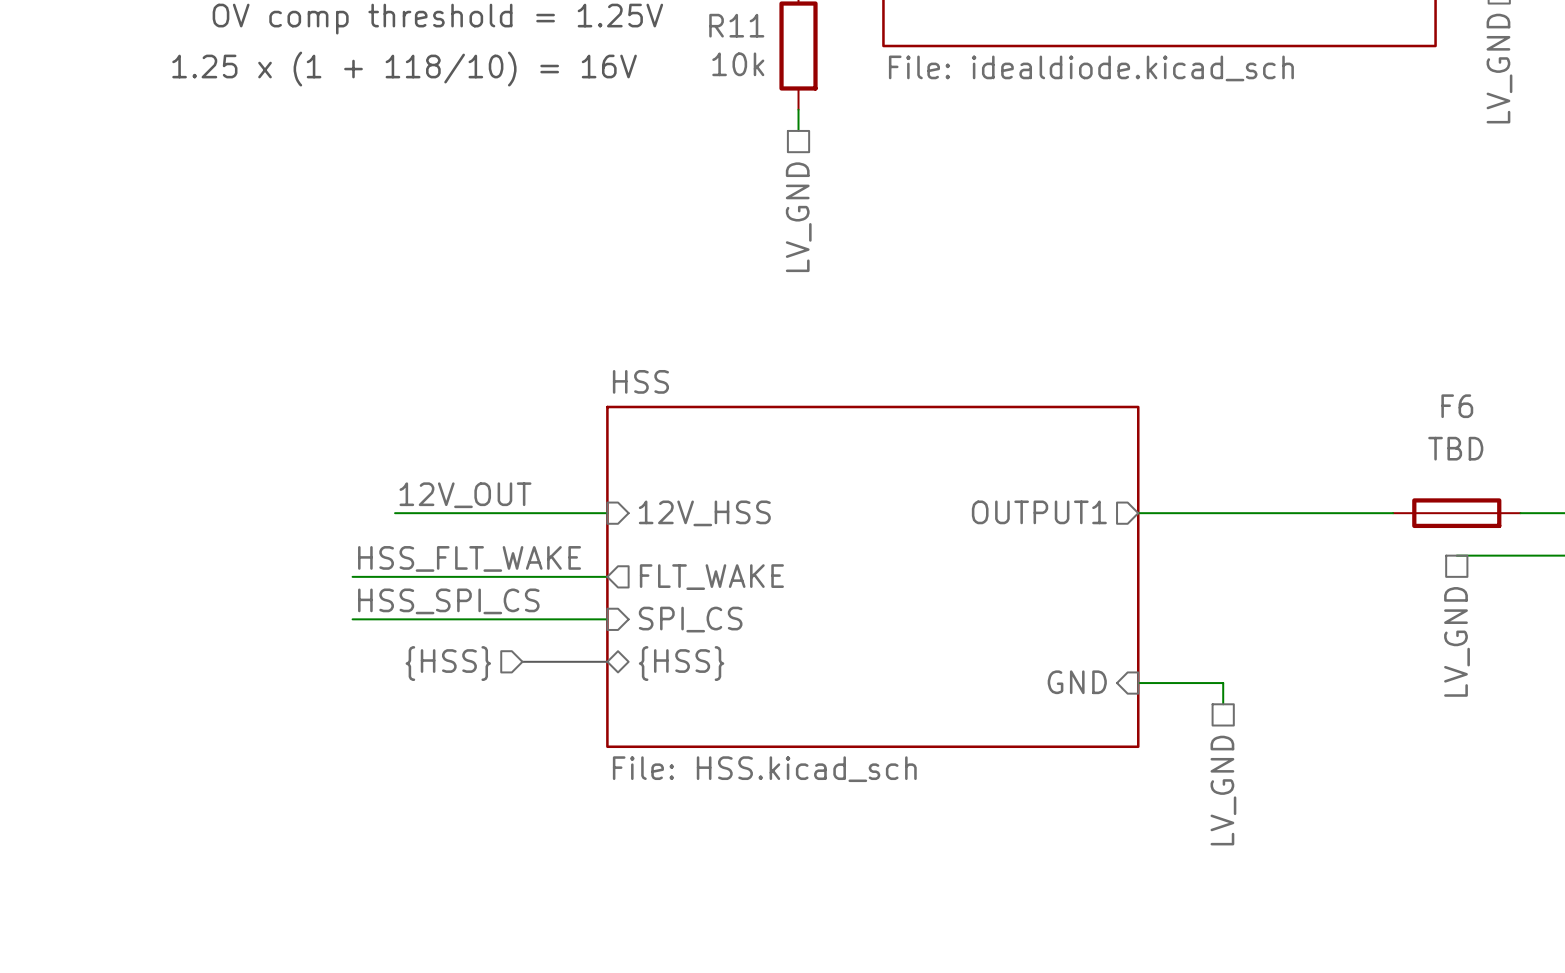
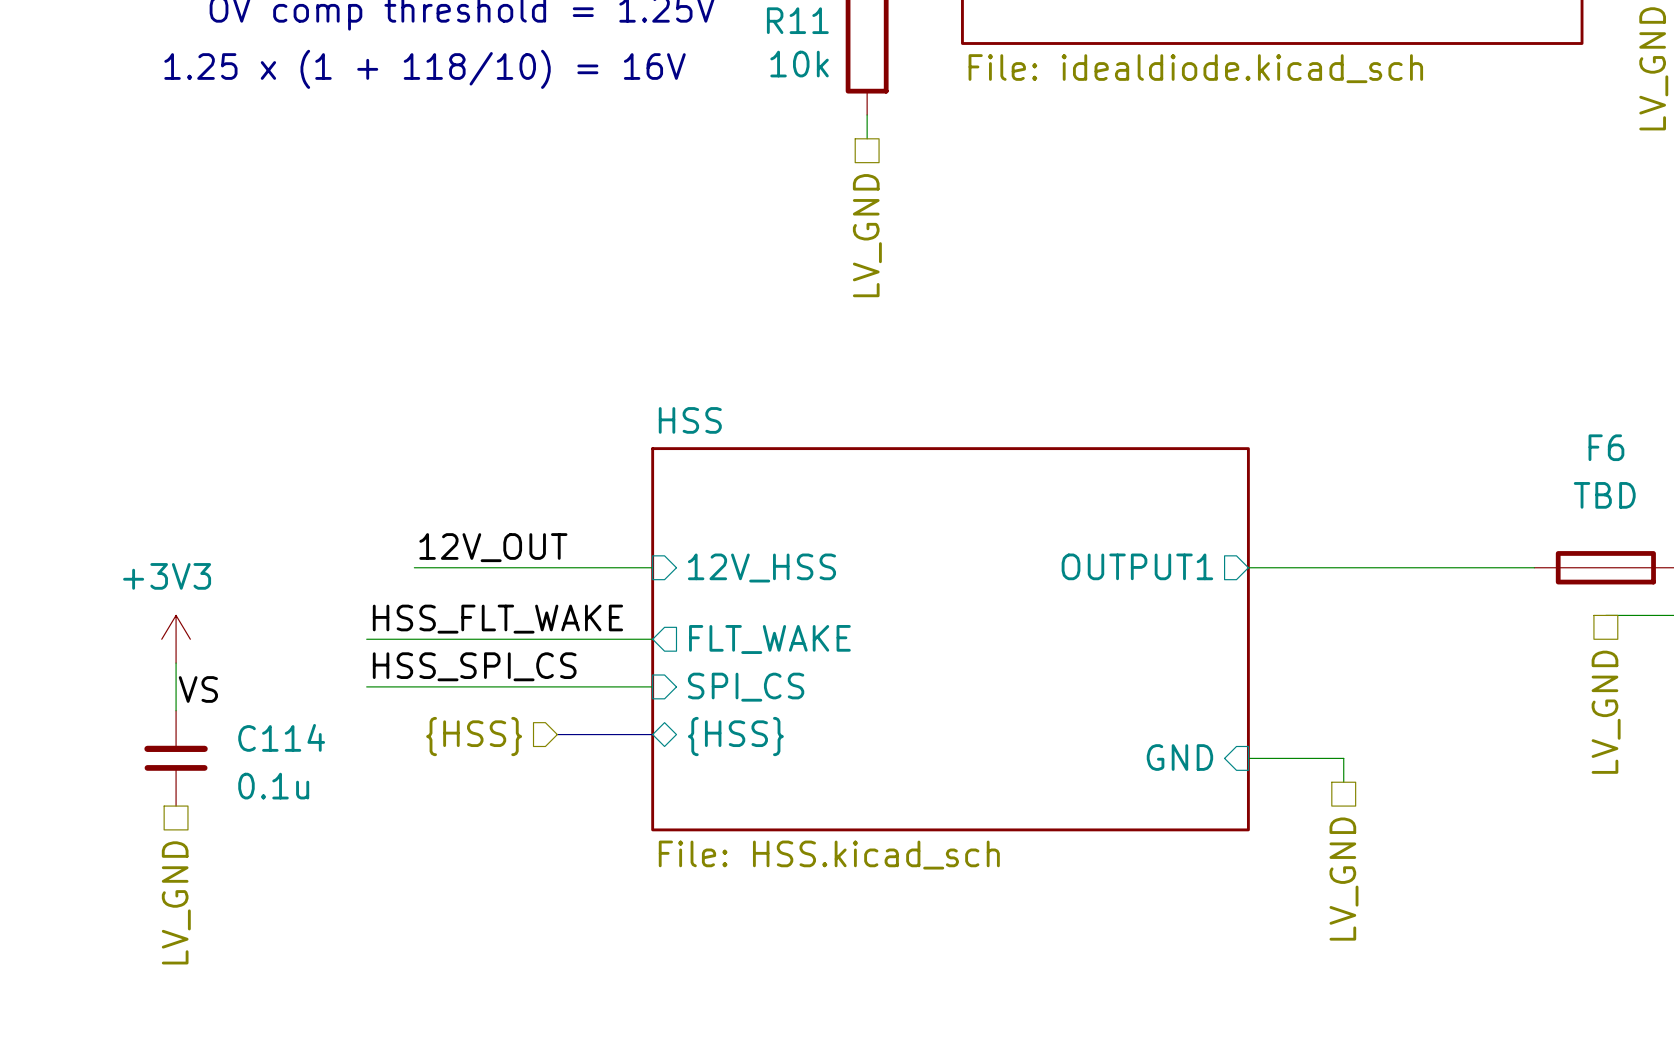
power symbol: none -> +3V3 (176, 639)
wire: none -> (176, 663) (176, 710)
label: none -> VS (198, 689)
C114: none -> 0.1u (176, 758)
hierarchical label: none -> LV_GND (176, 902)

